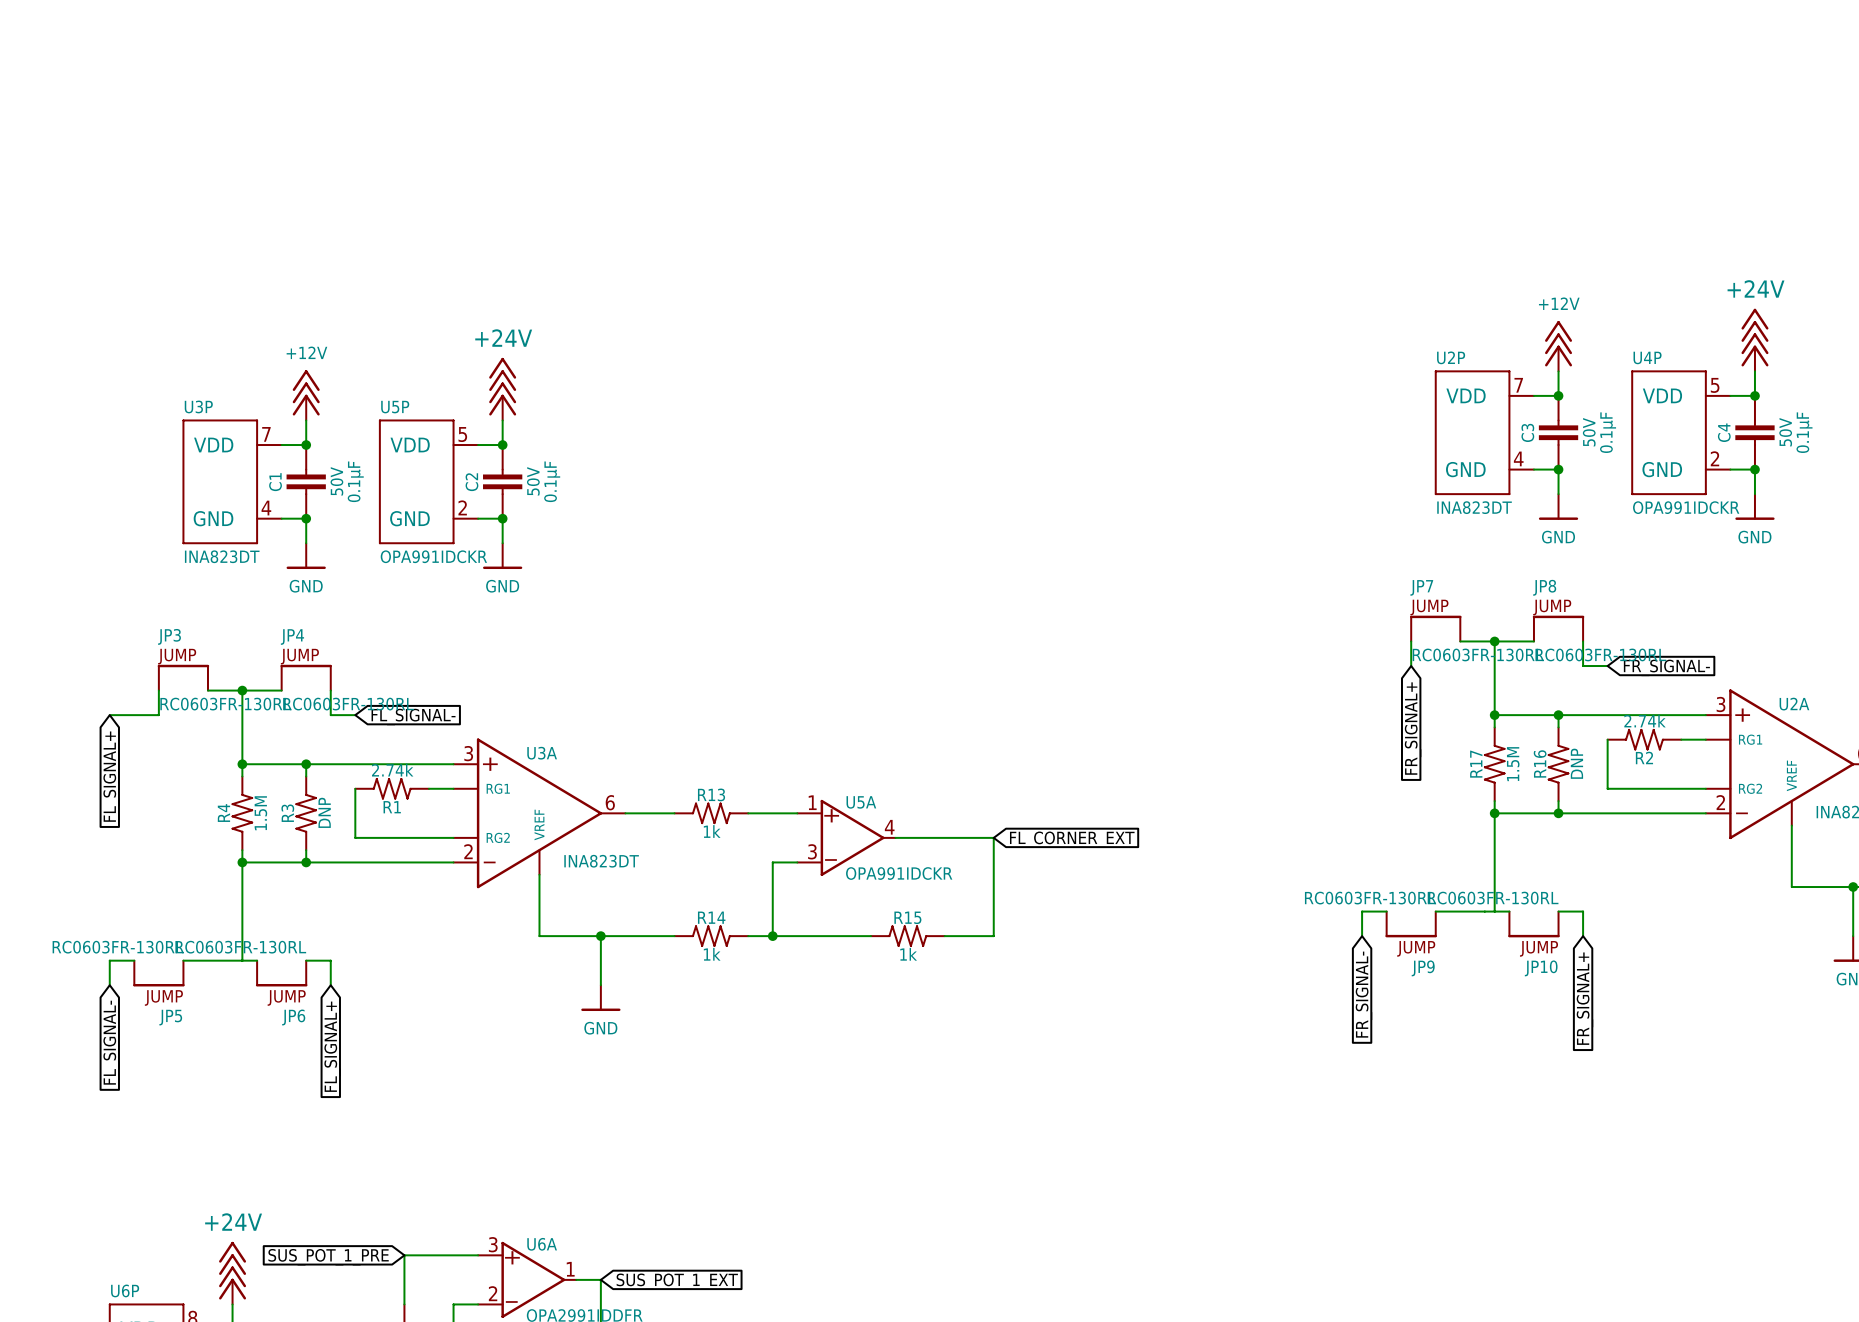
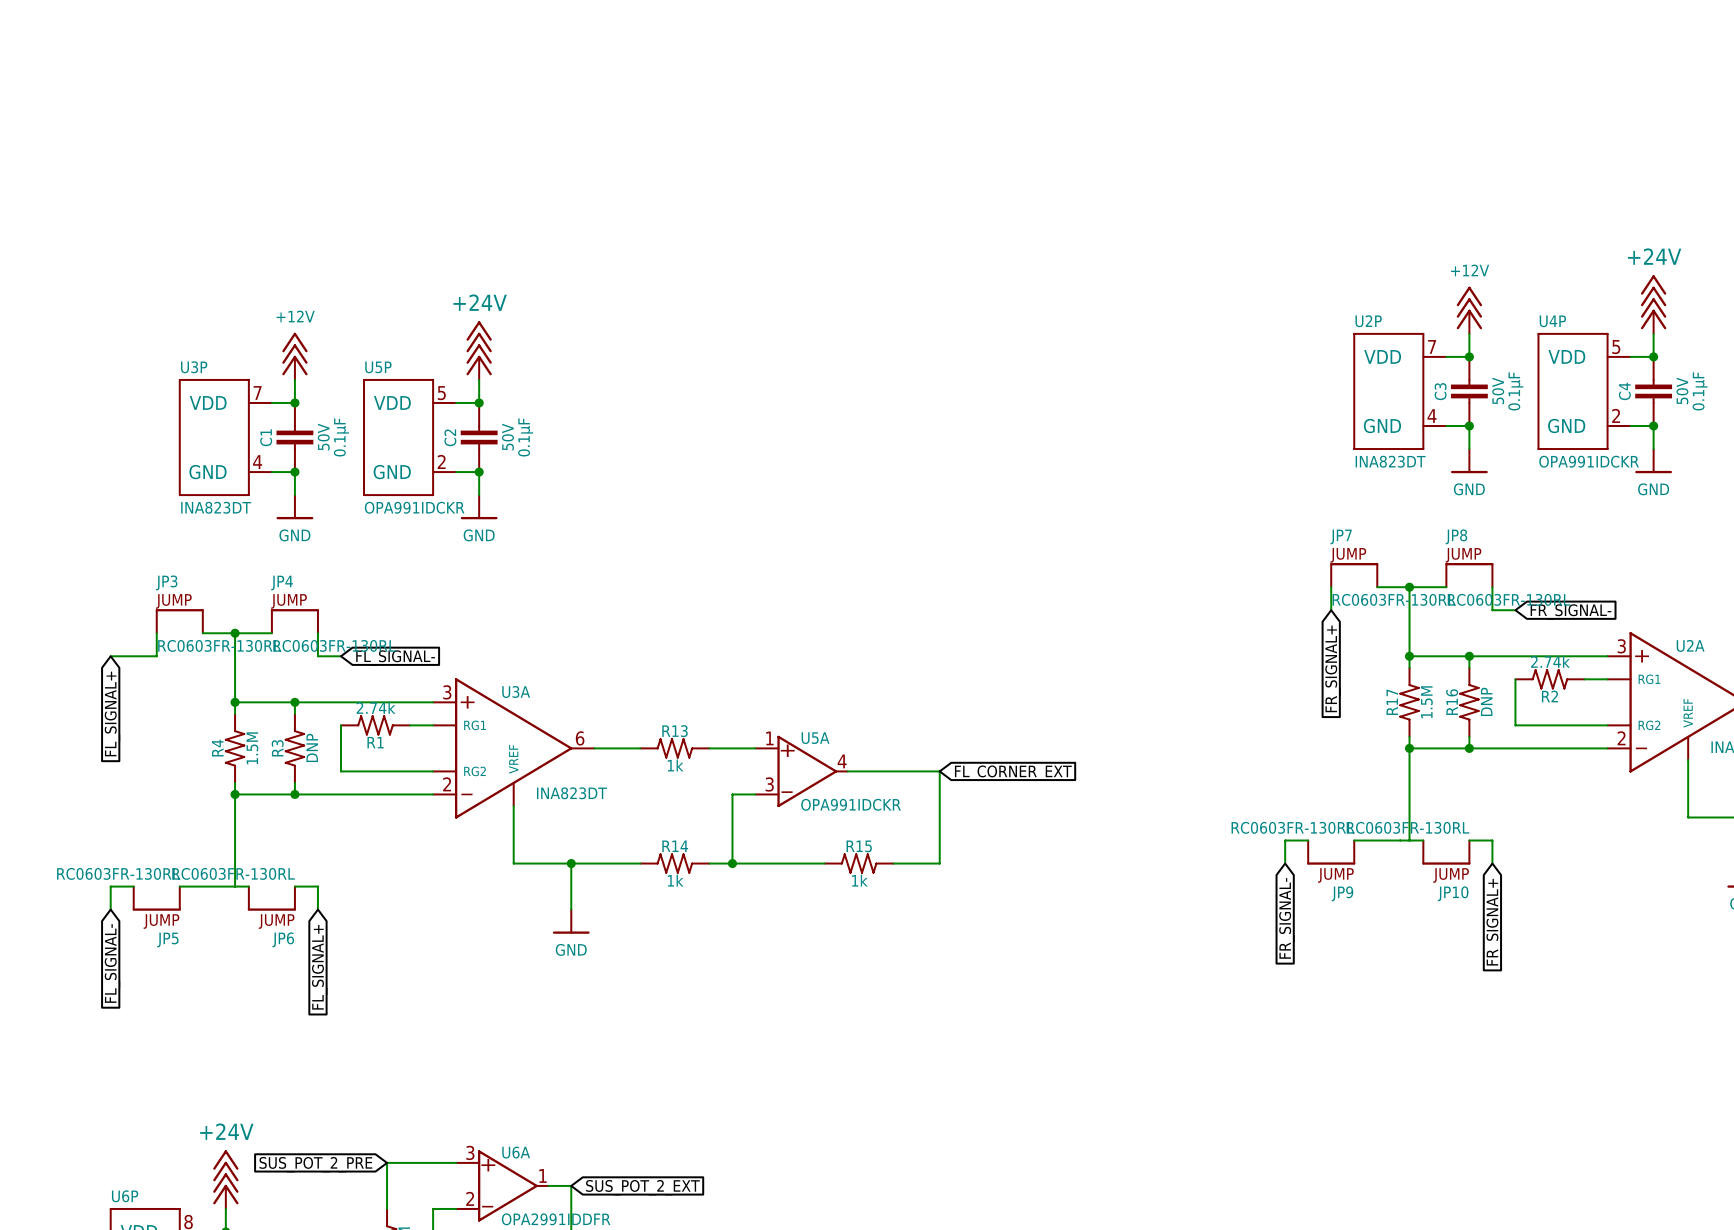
global label: SUS_POT_1_PRE (328, 1257) -> SUS_POT_2_PRE (315, 1164)
global label: SUS_POT_1_EXT (677, 1281) -> SUS_POT_2_EXT (642, 1187)

